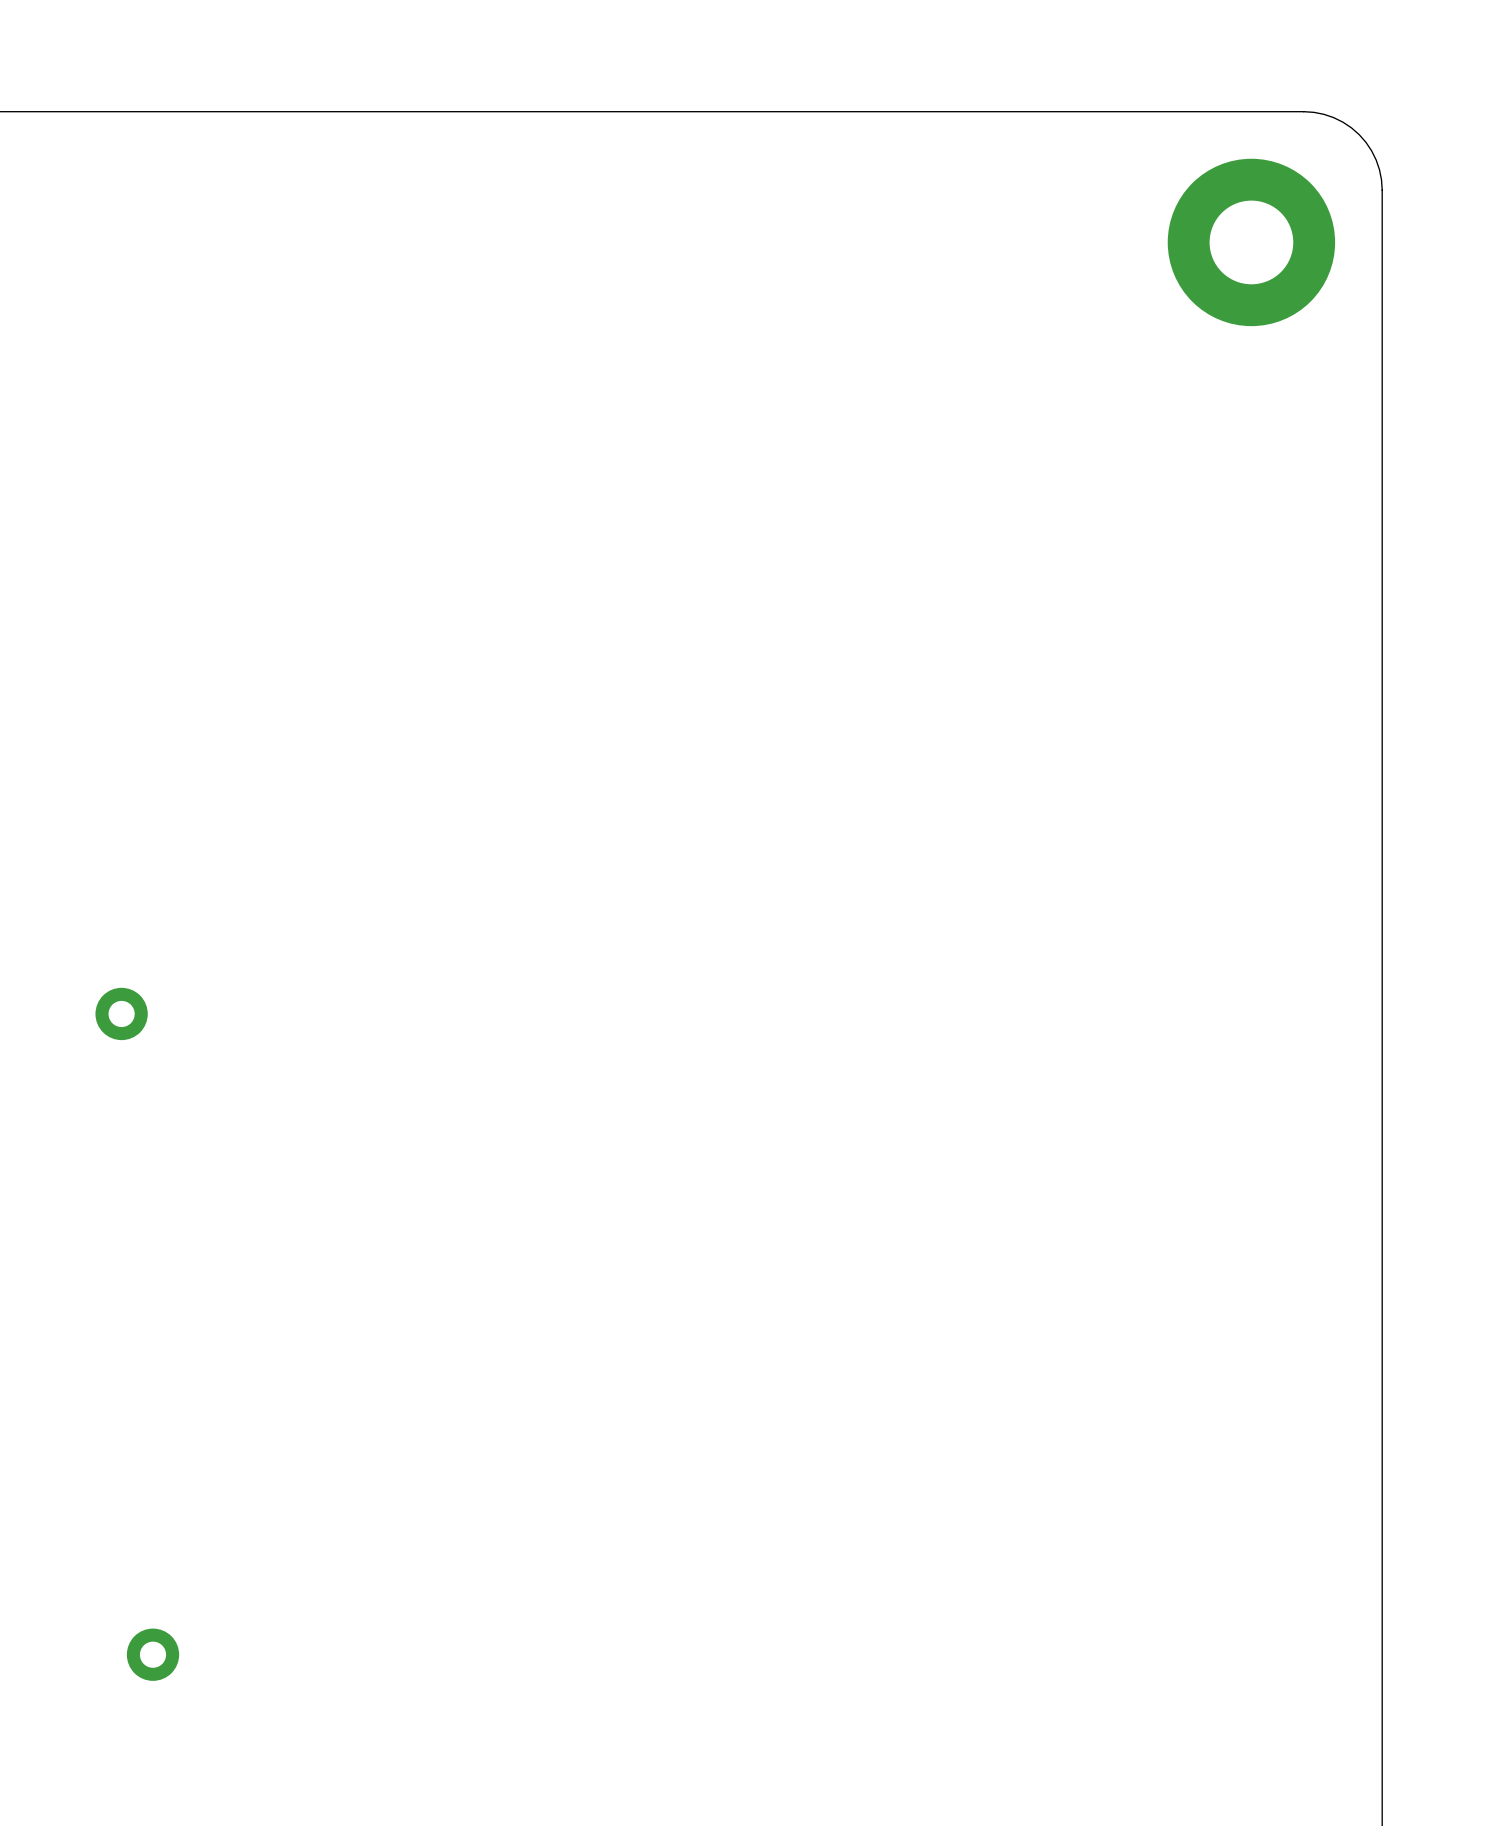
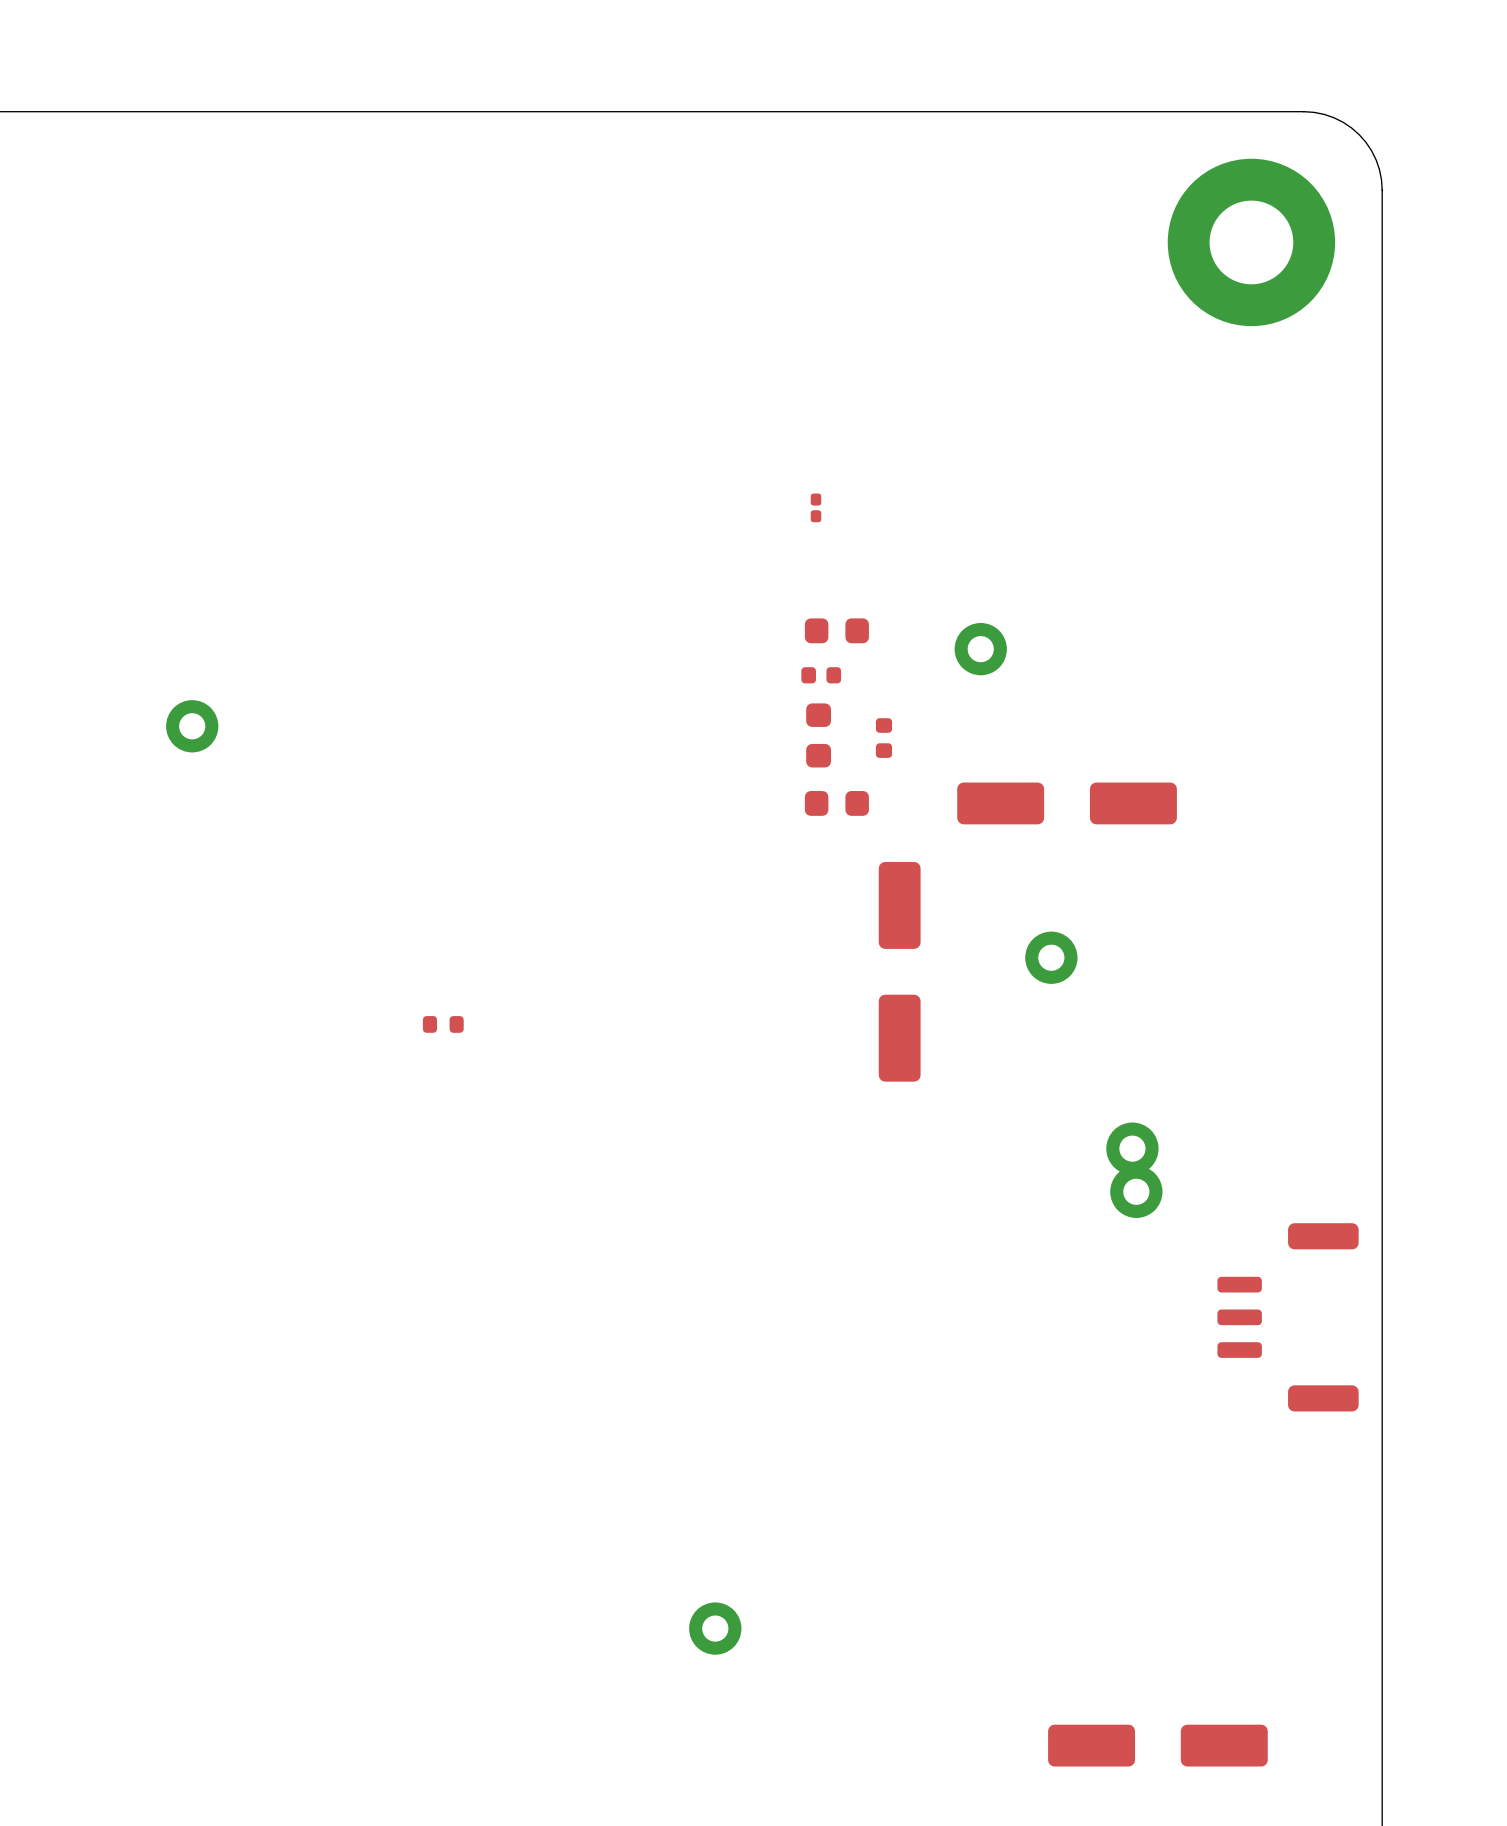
part: none -> (815, 507)
part: none -> (836, 630)
part: none -> (980, 649)
part: none -> (821, 675)
part: none -> (818, 735)
part: none -> (883, 738)
part: none -> (836, 803)
part: none -> (1067, 803)
part: none -> (1051, 957)
part: none -> (899, 971)
part position: (121, 1013) -> (192, 726)
part: none -> (443, 1024)
part: none -> (1132, 1148)
part: none -> (1136, 1191)
part: none -> (1288, 1317)
part: none -> (715, 1628)
part: (153, 1654) -> none
part: none -> (1157, 1745)

